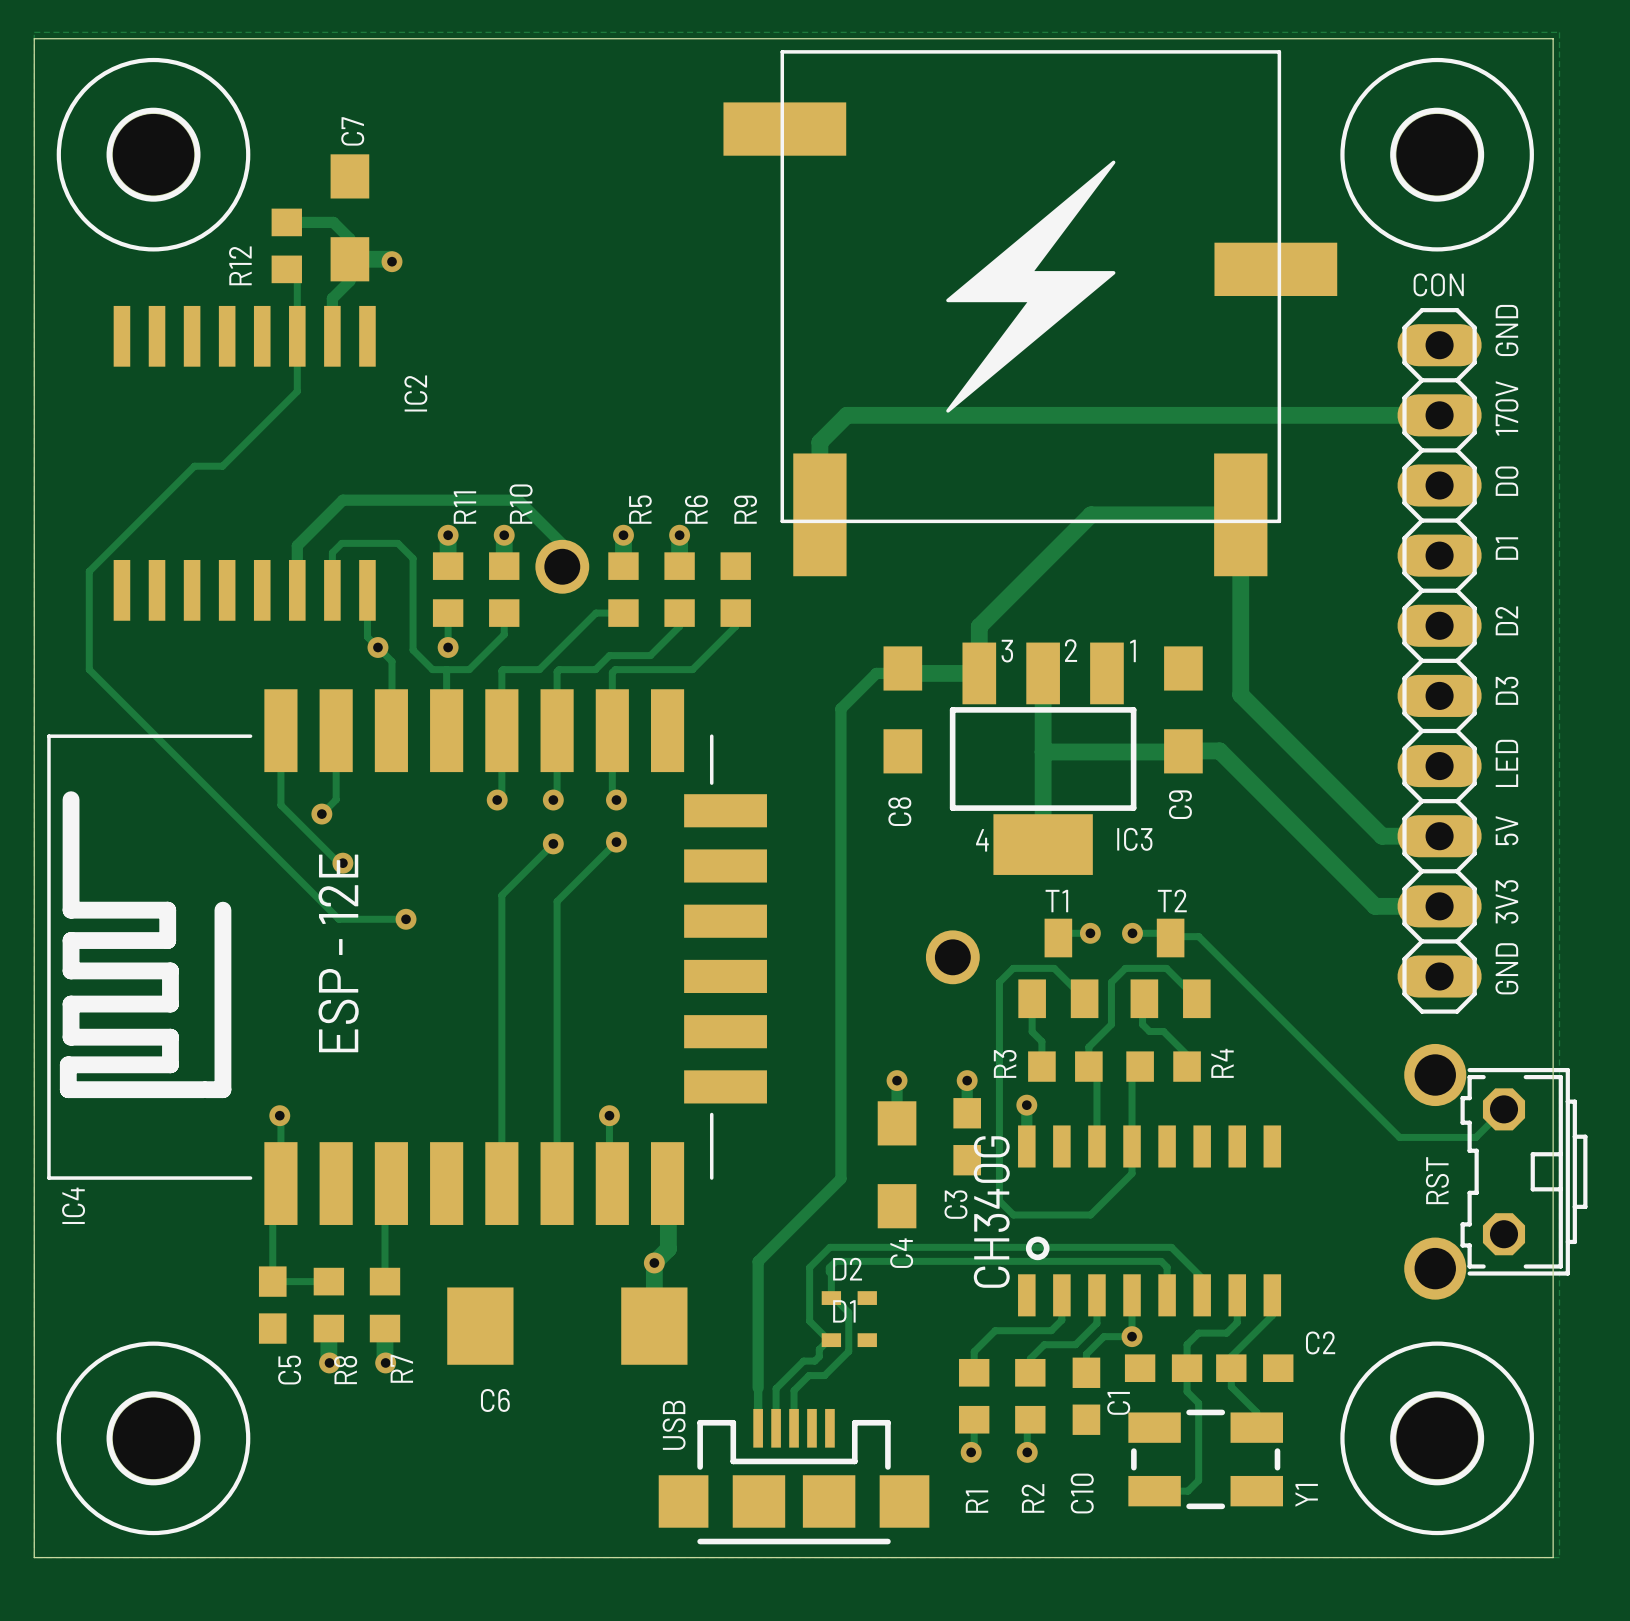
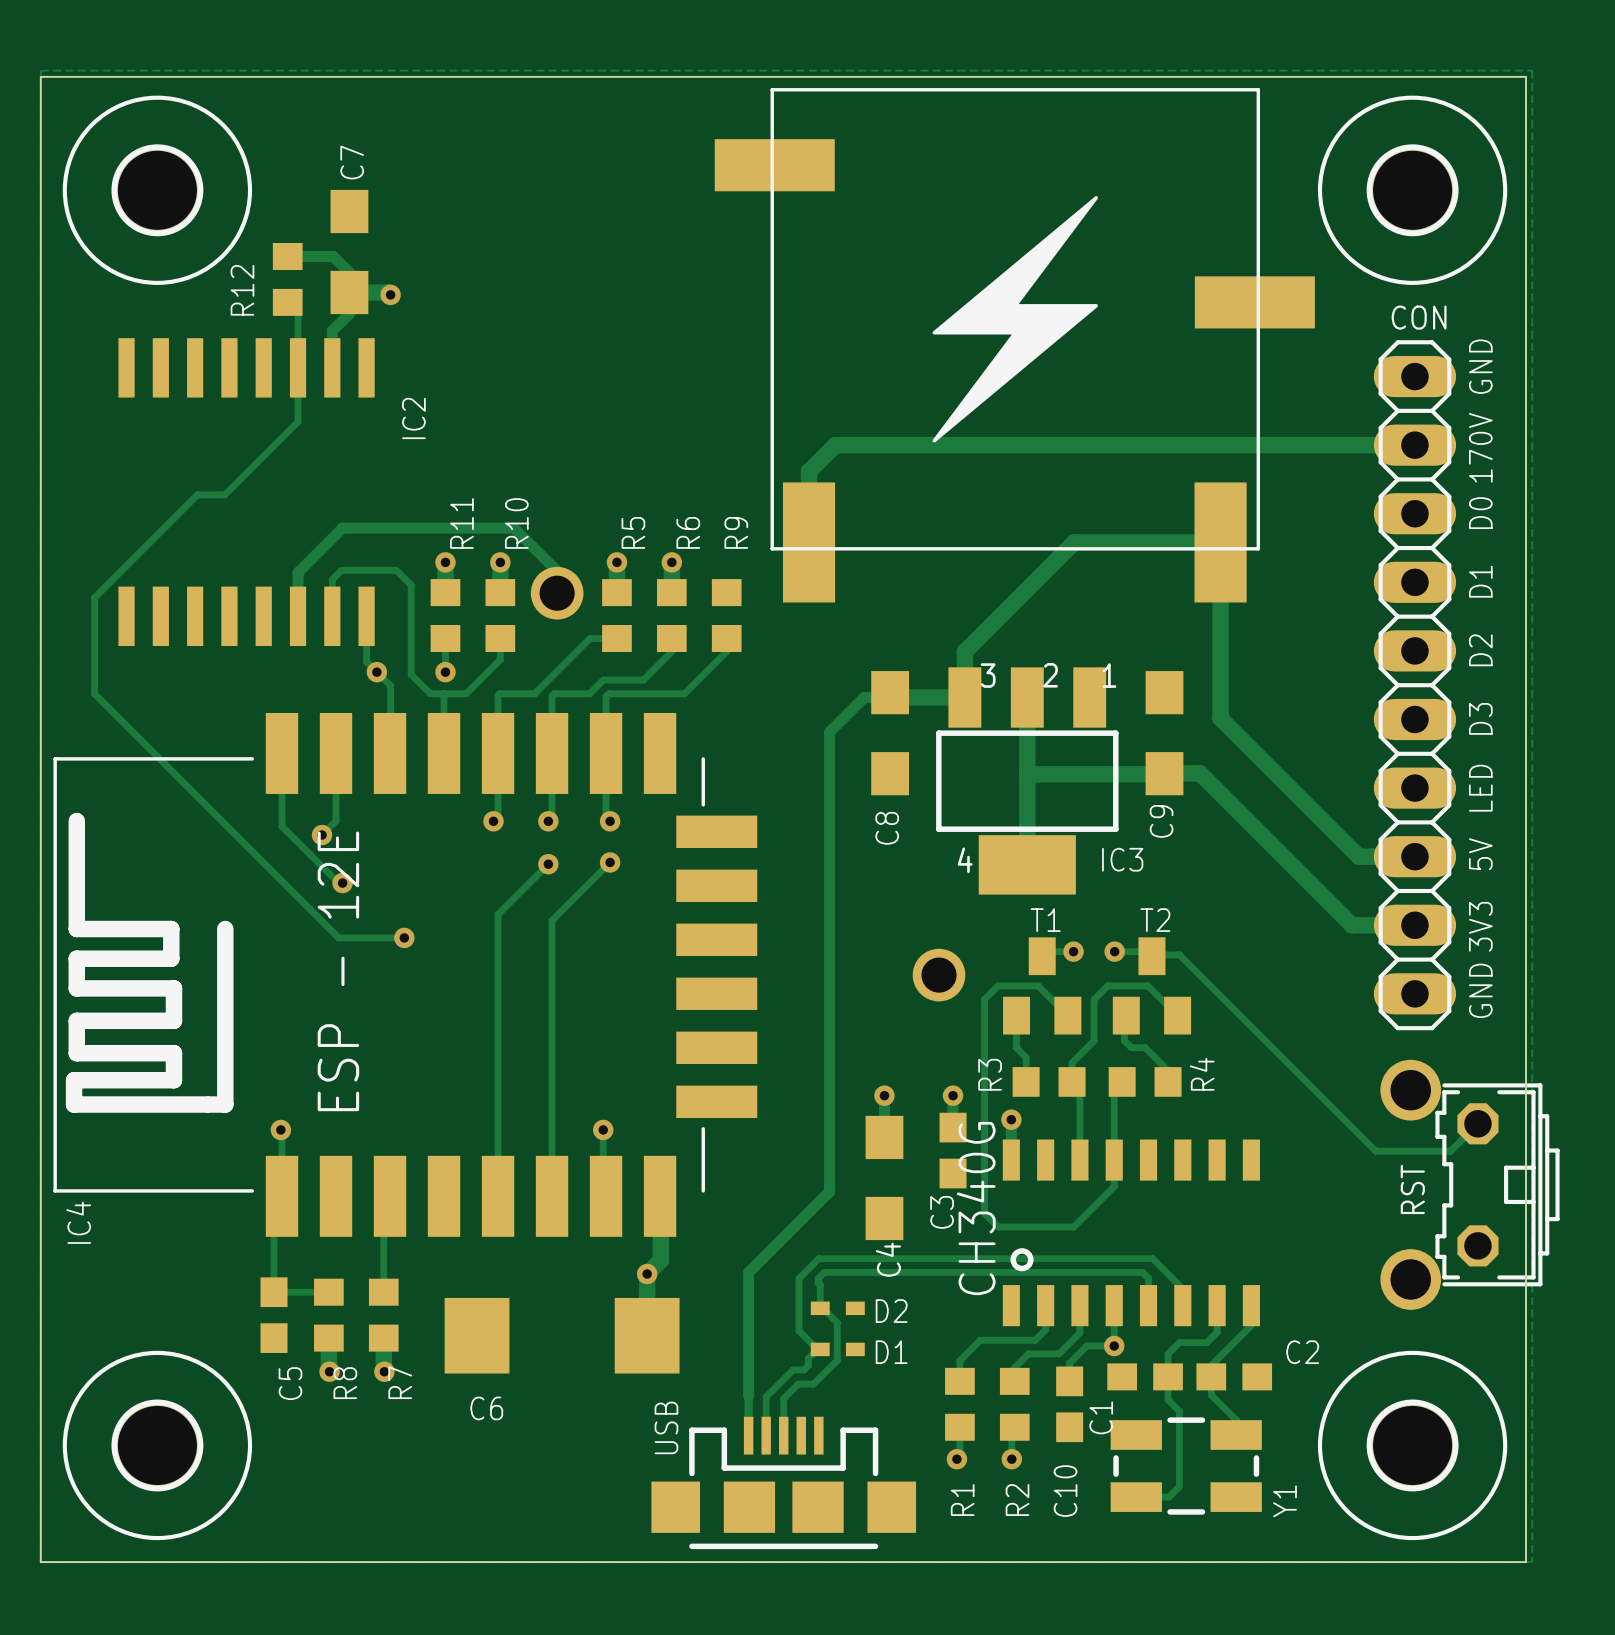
D2 name position: D2 (847, 1269) -> D2 (891, 1311)
D1 name position: D1 (844, 1311) -> D1 (891, 1352)

